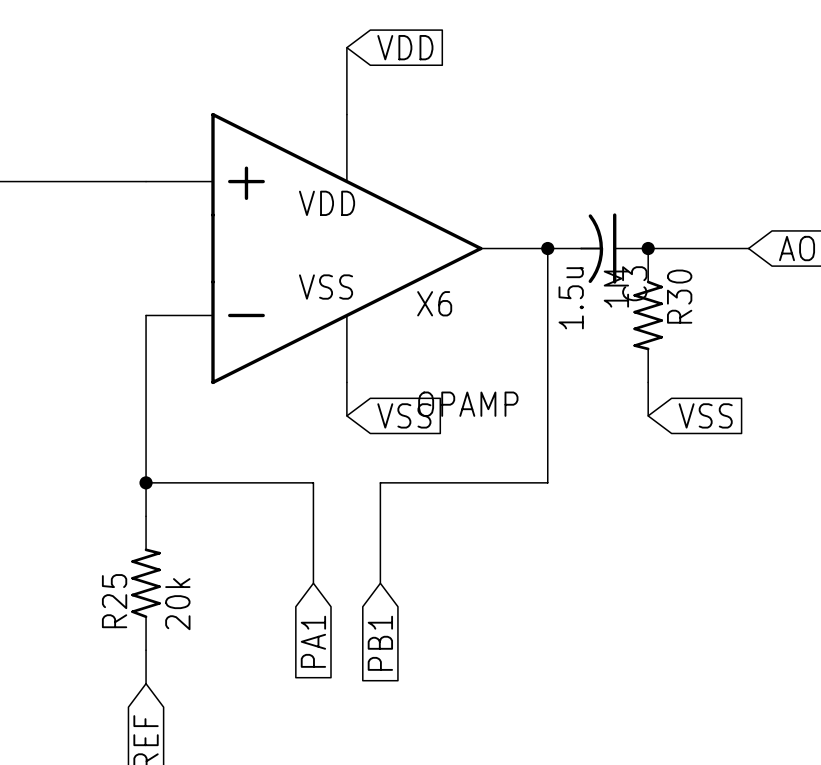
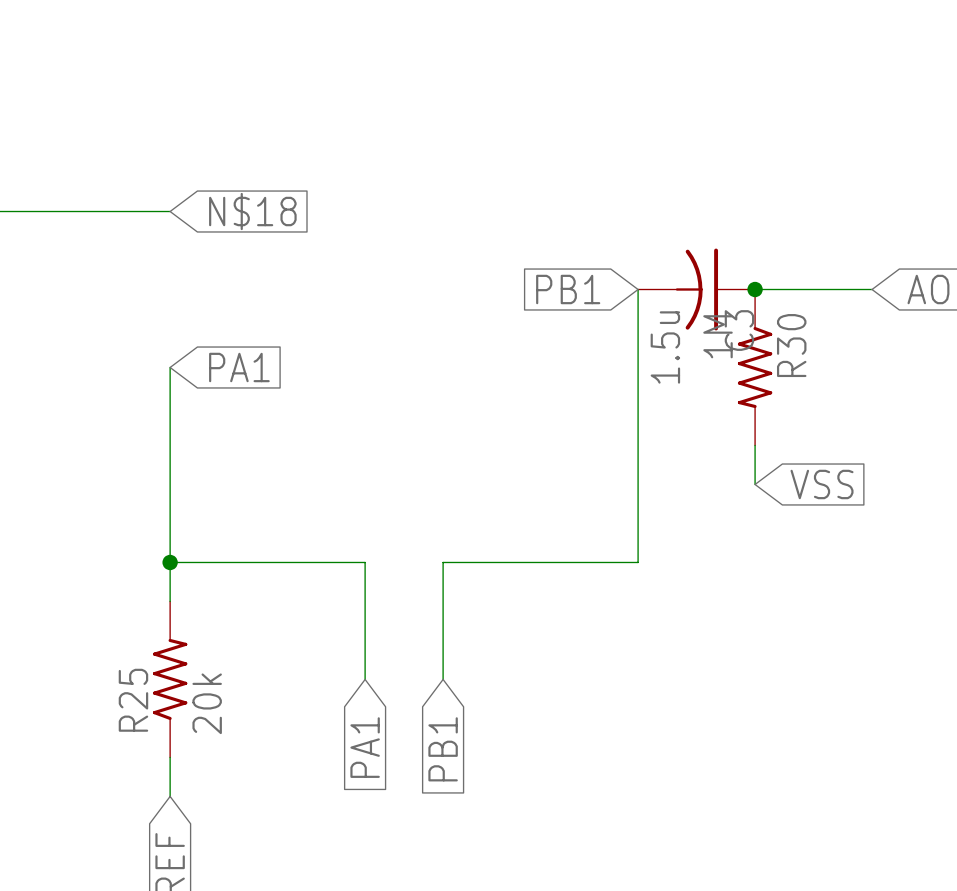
wire: (346, 47) (346, 114) -> none
global label: VDD (405, 47) -> none
global label: none -> N$18 (252, 211)
X6: OPAMP (346, 248) -> none
global label: none -> PB1 (568, 289)
junction: (547, 248) -> none
global label: none -> PA1 (239, 367)
wire: (346, 382) (346, 415) -> none
global label: VSS (404, 415) -> none

